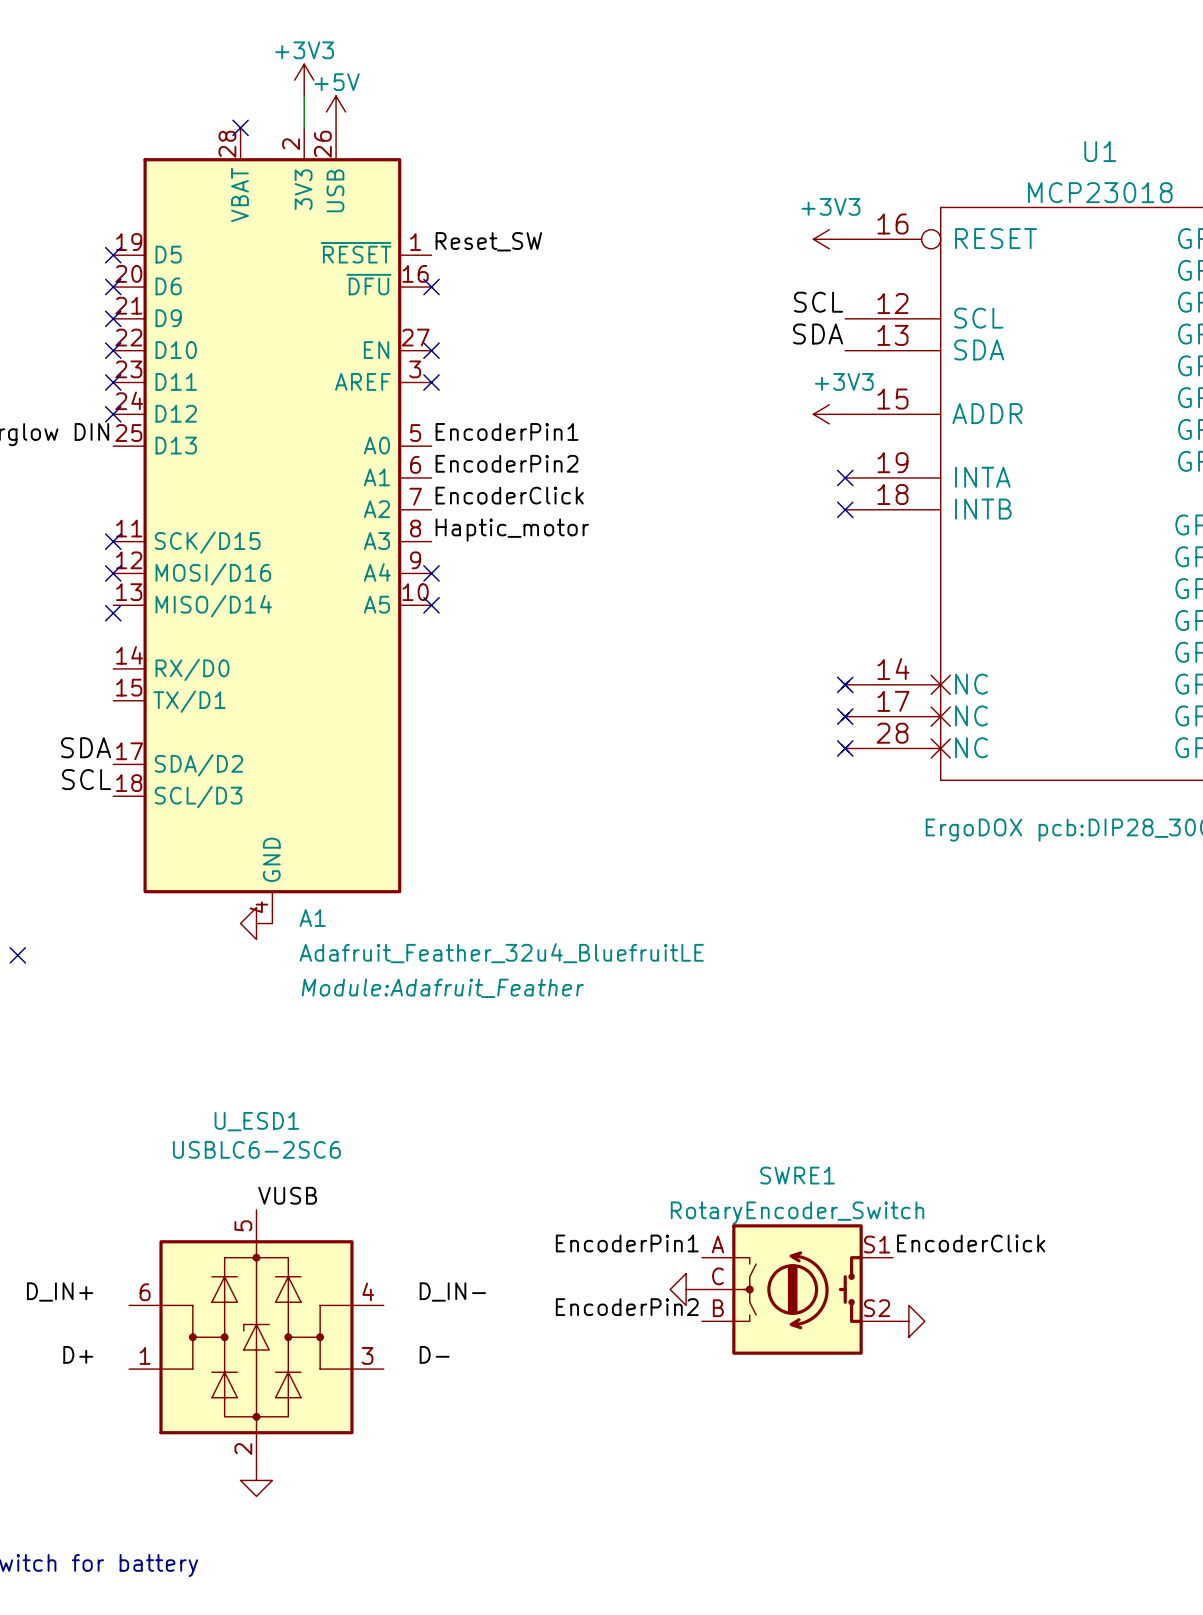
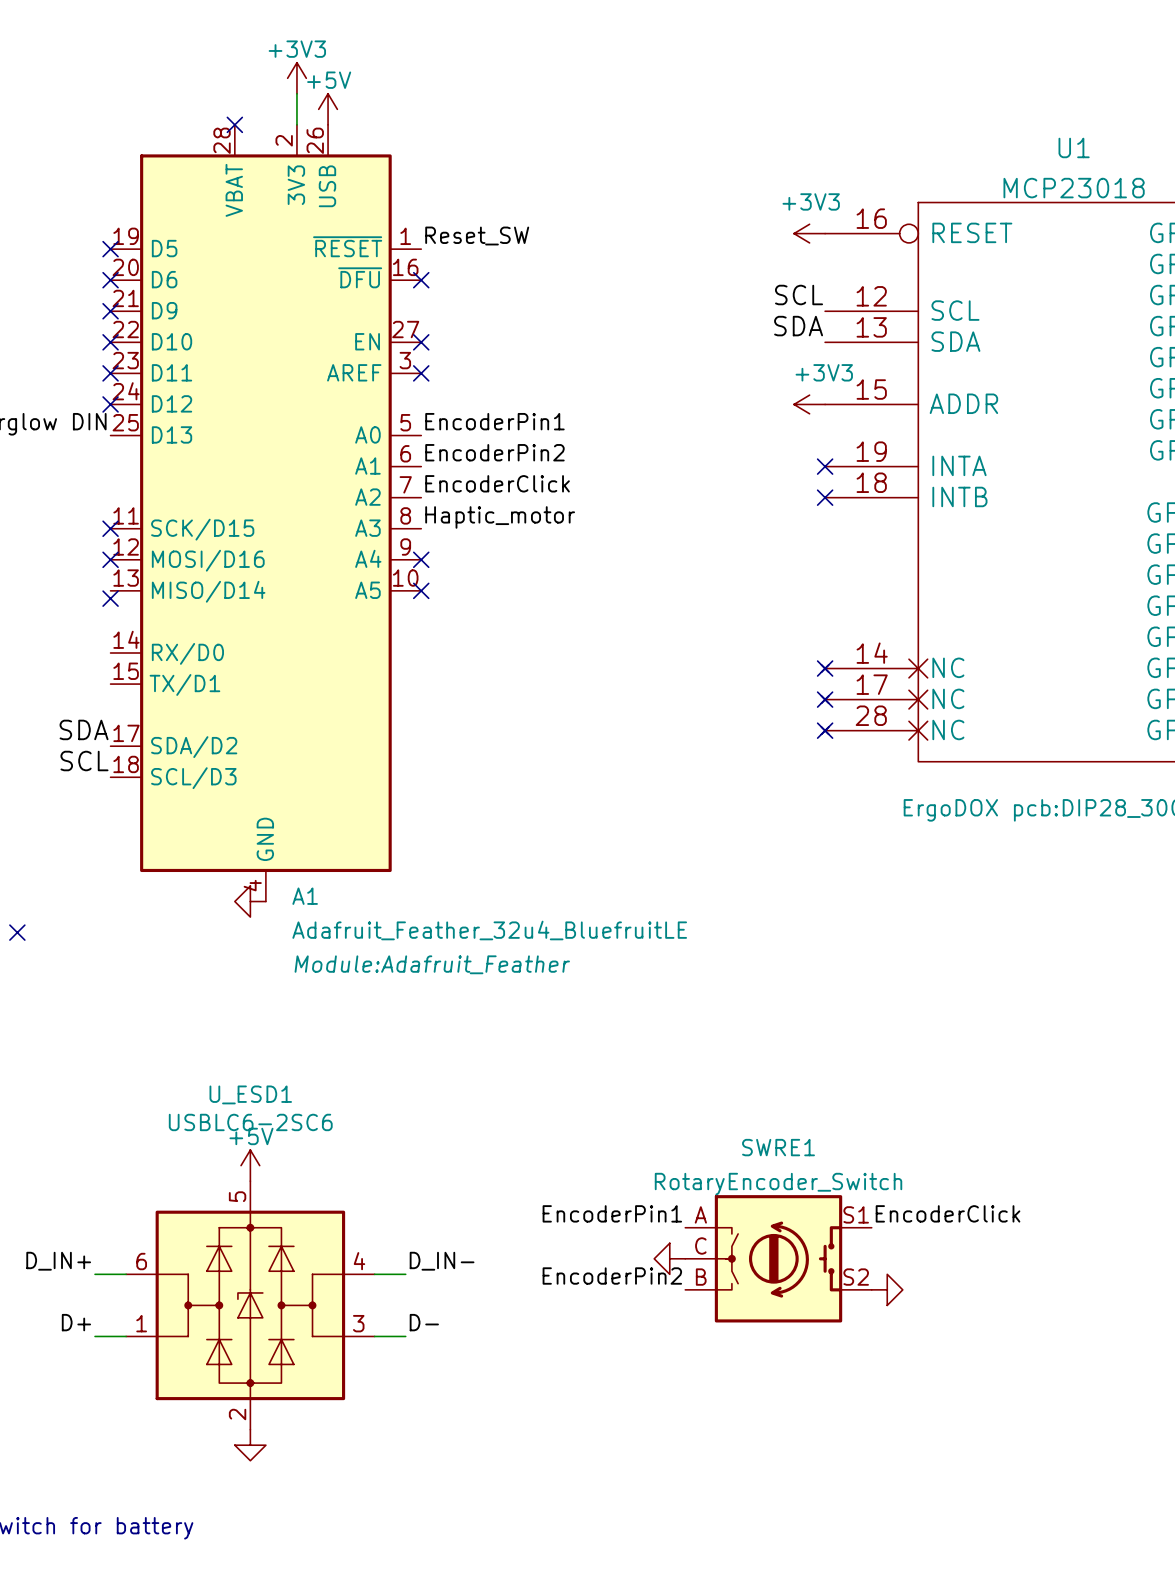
power symbol: none -> +5V (250, 1165)
label: VUSB (287, 1195) -> none
wire: none -> (95, 1274) (126, 1274)
wire: none -> (374, 1274) (405, 1274)
wire: none -> (95, 1336) (126, 1336)
wire: none -> (374, 1336) (405, 1336)

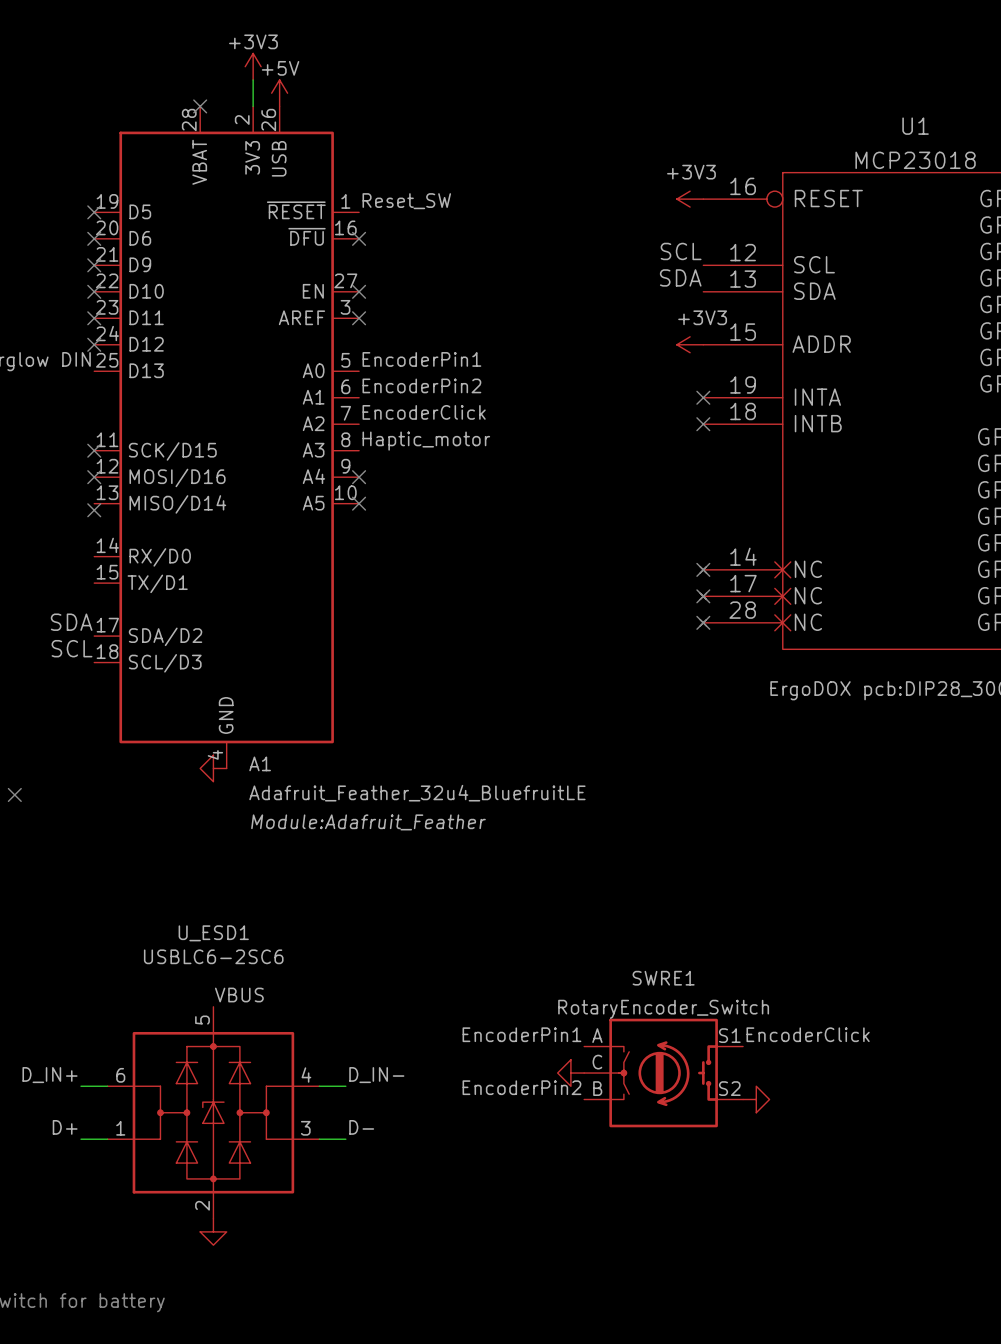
power symbol: +5V (250, 1165) -> none
label: none -> VBUS (239, 995)

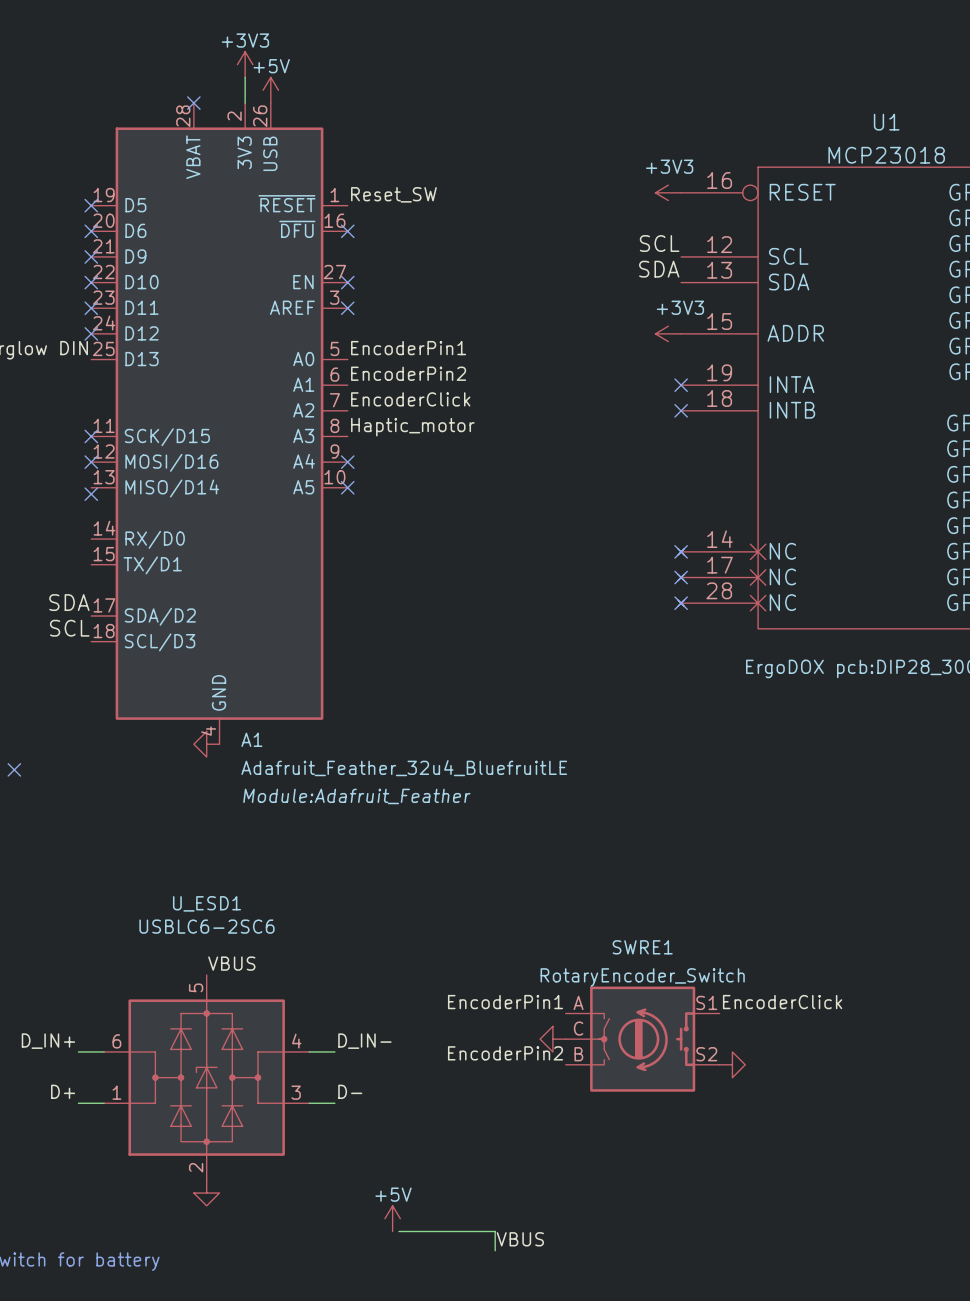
power symbol: none -> +5V (392, 1218)
wire: none -> (399, 1231) (495, 1231) (495, 1250)
label: none -> VBUS (520, 1239)

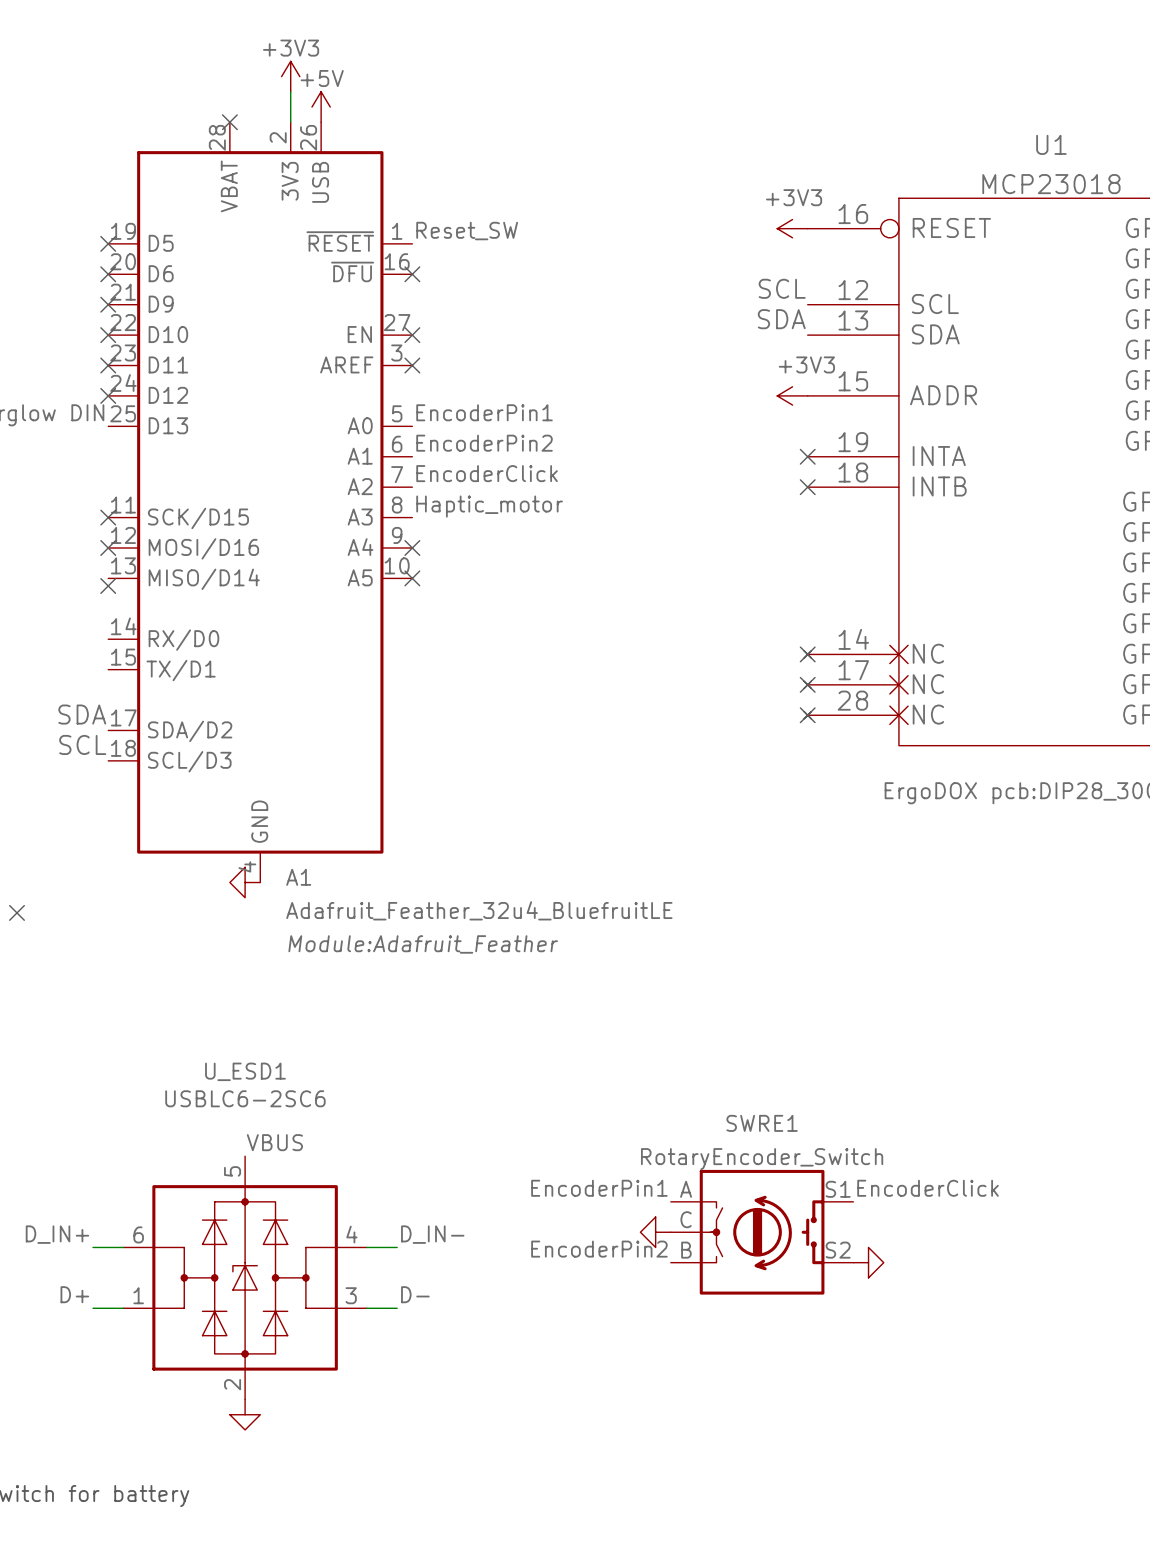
power symbol: +5V (392, 1218) -> none
wire: (399, 1231) (495, 1231) (495, 1250) -> none
label: VBUS (520, 1239) -> none

